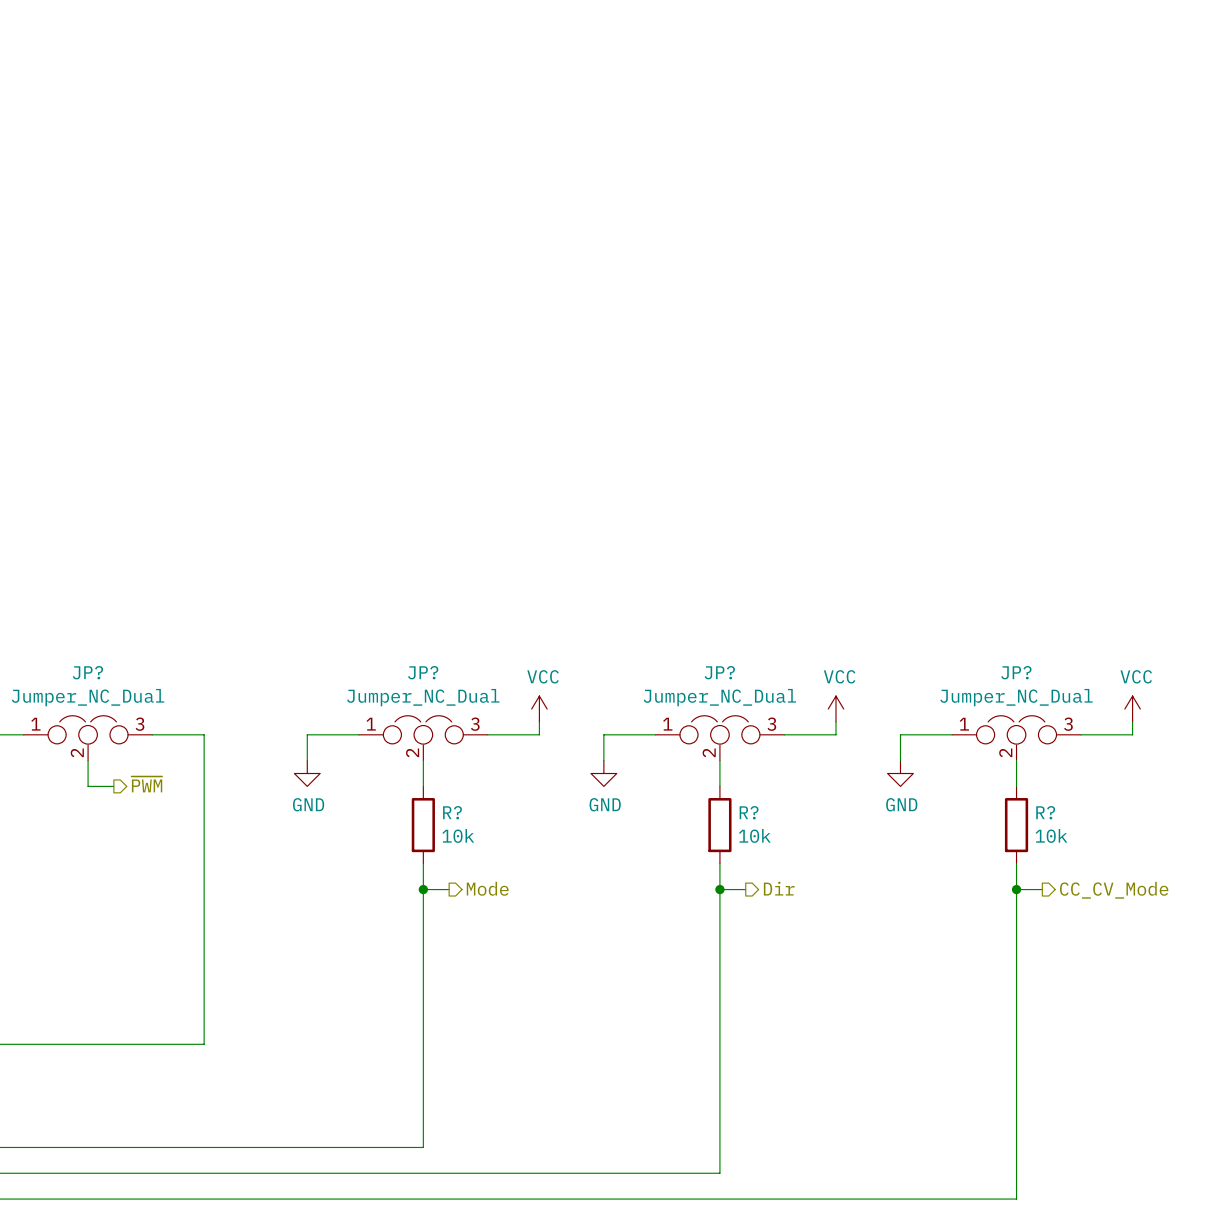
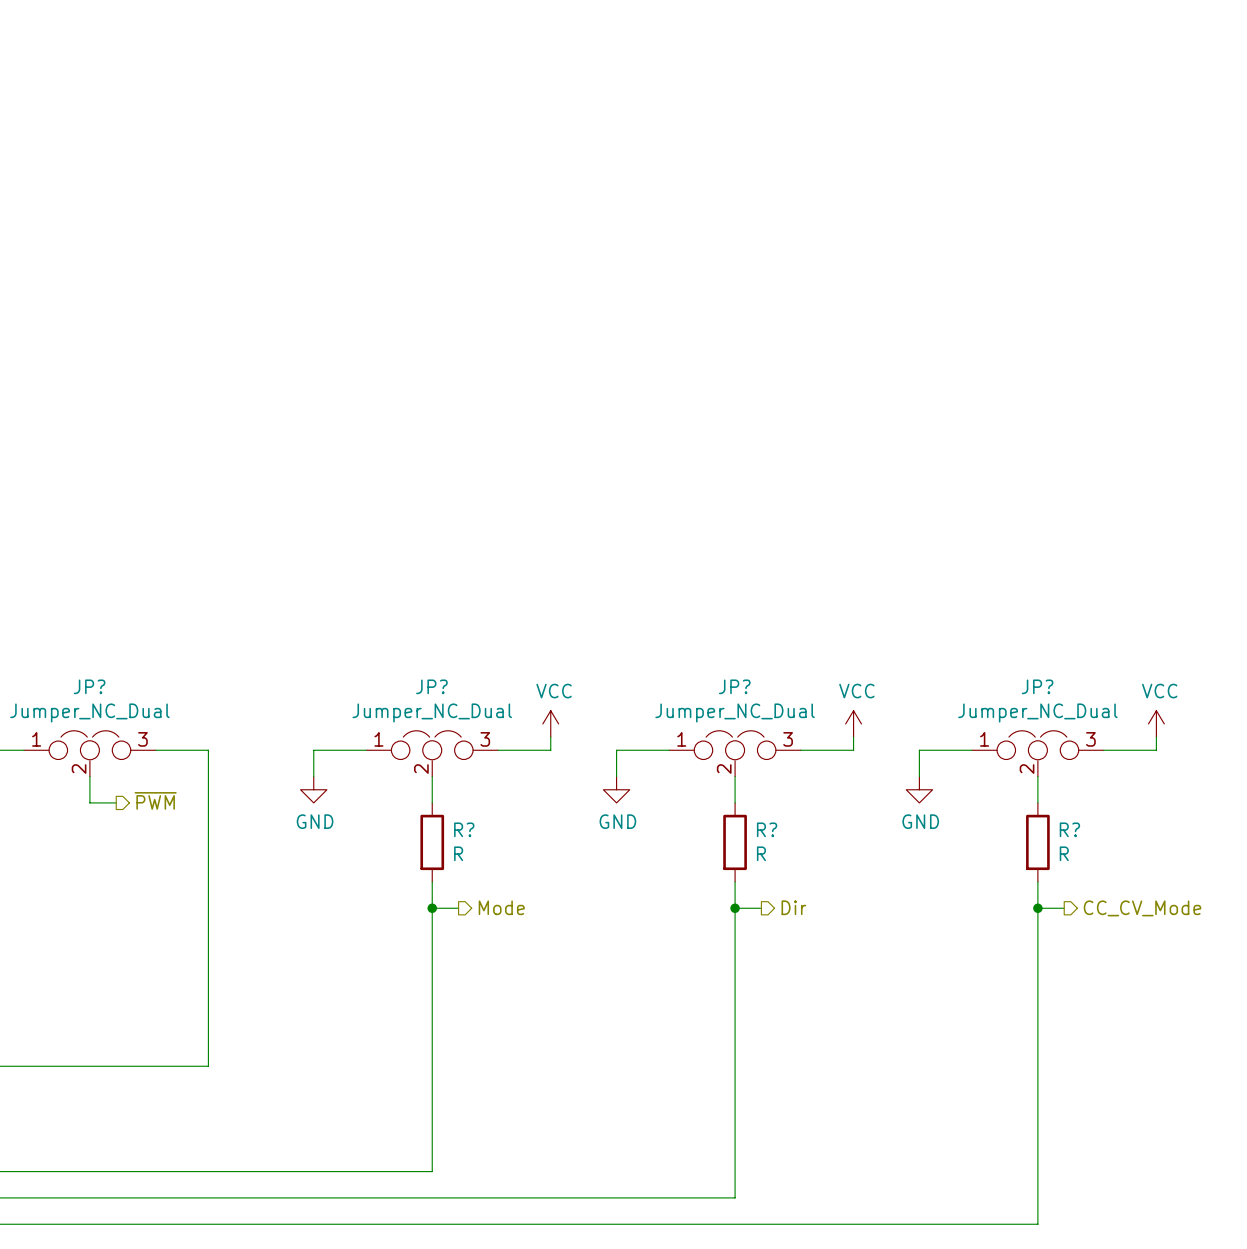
R? value: 10k (458, 835) -> R (458, 853)
R? value: 10k (754, 835) -> R (761, 853)
R? value: 10k (1051, 835) -> R (1064, 853)

